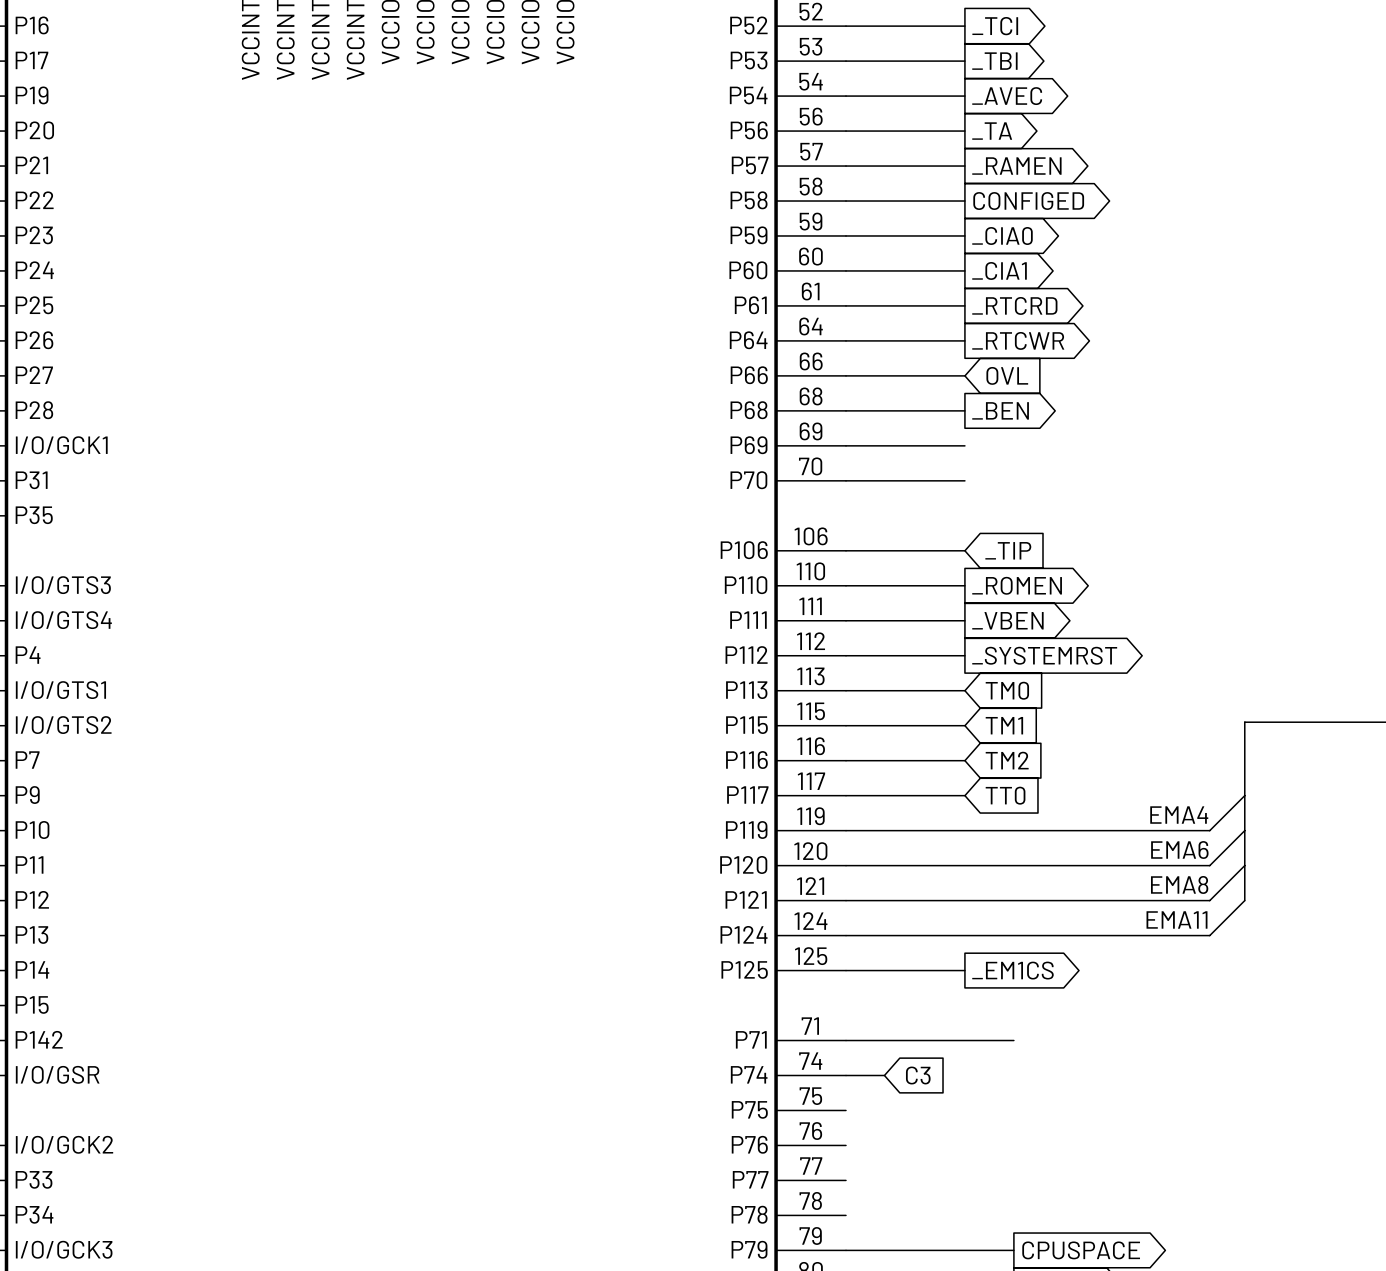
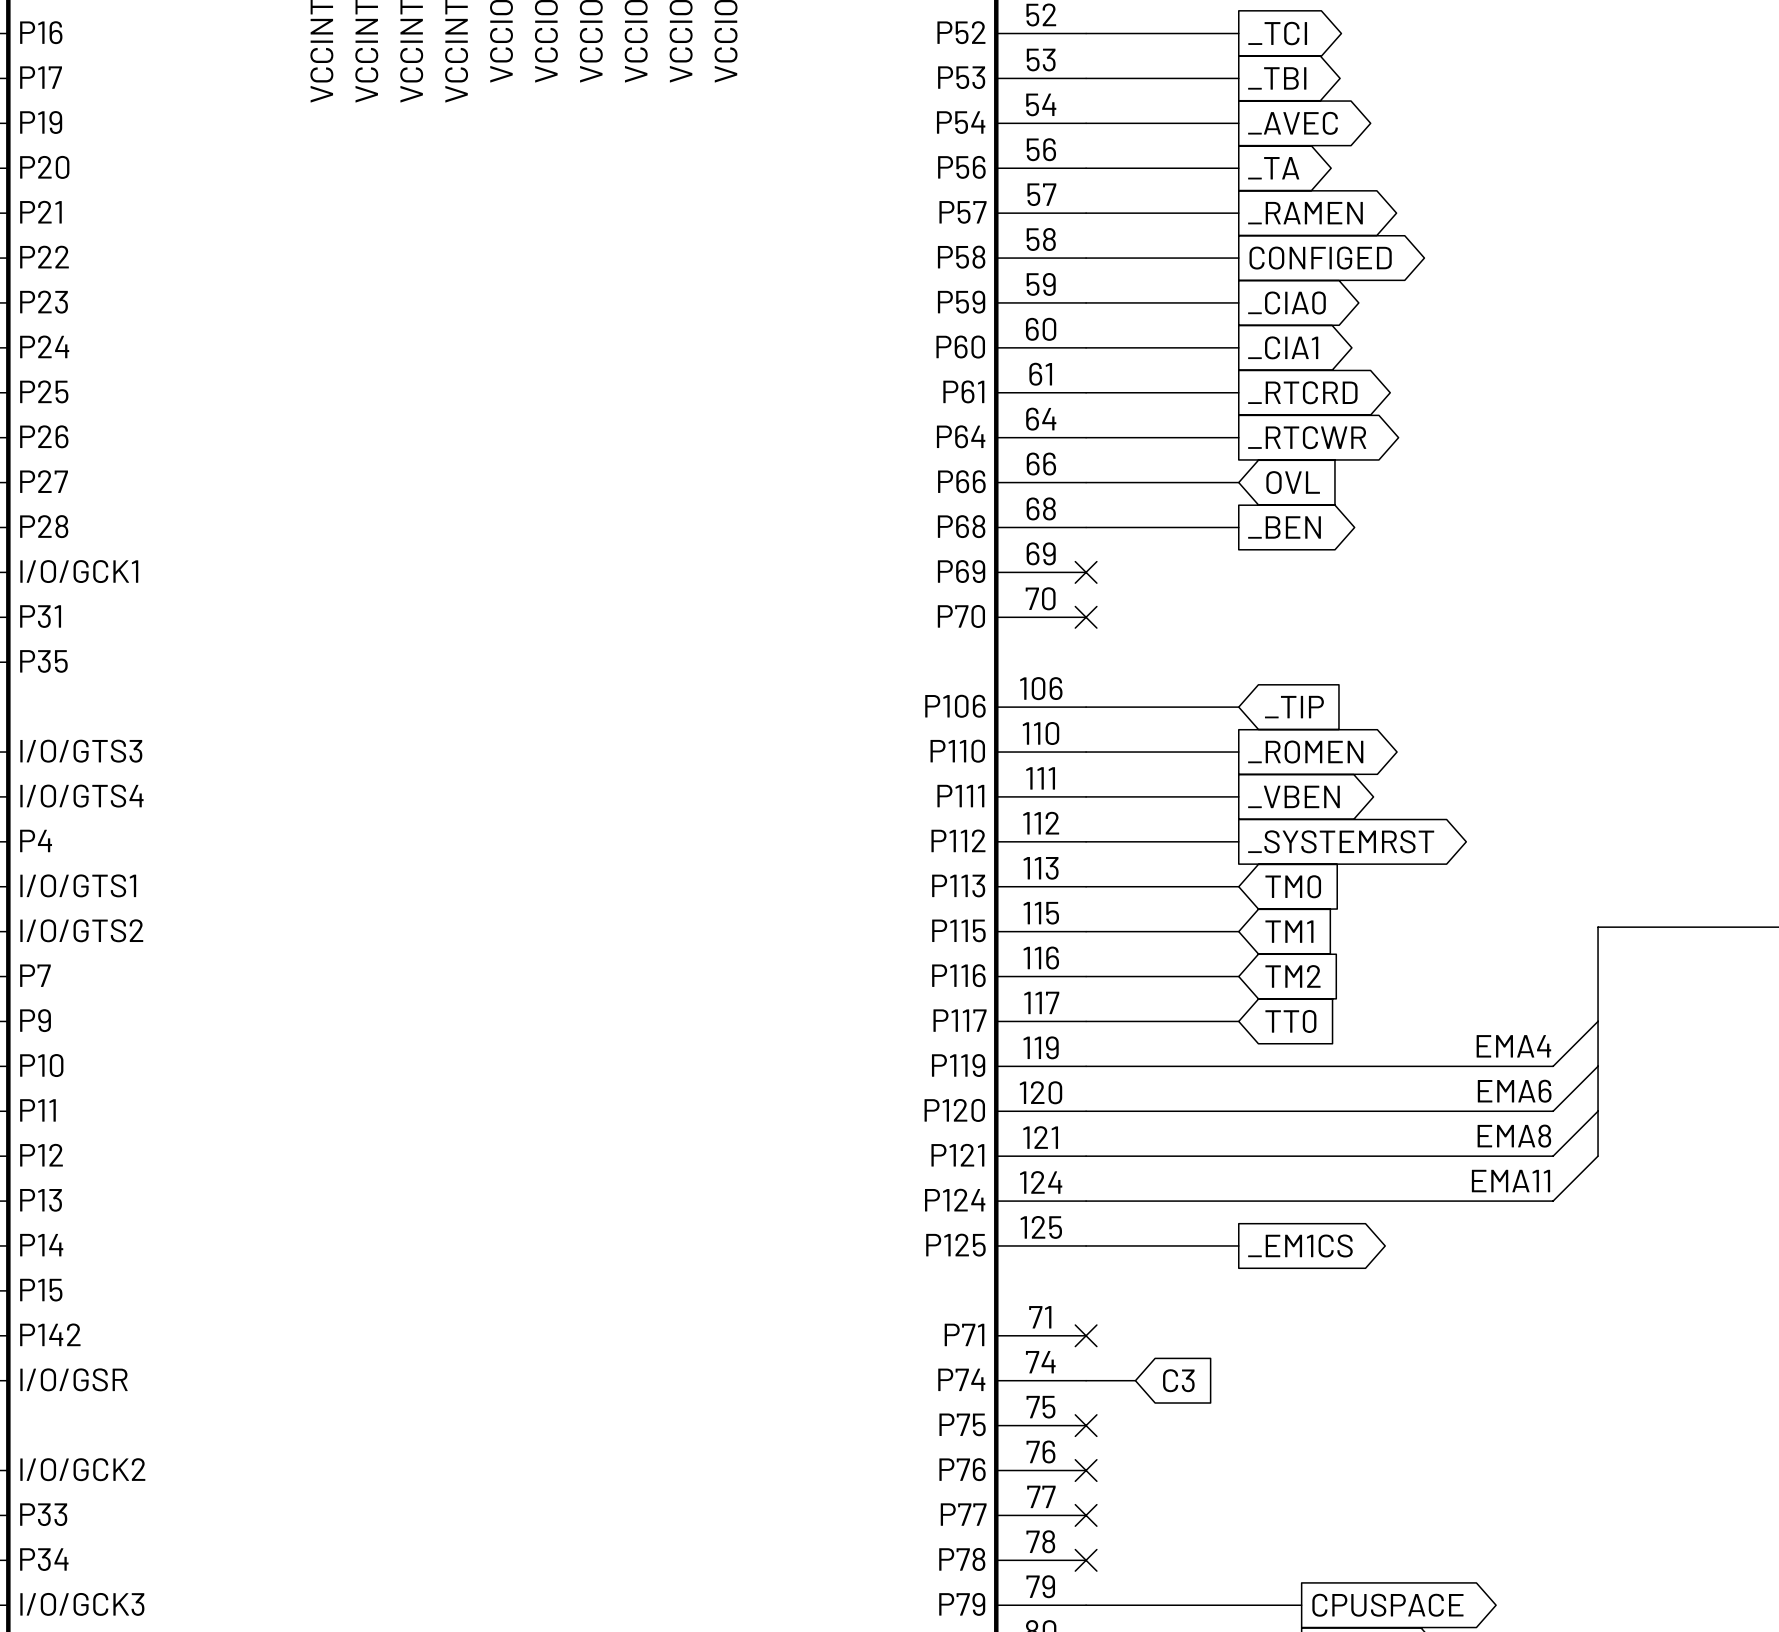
wire: (846, 445) (964, 445) -> none
no-connect mark: none -> (1086, 572)
wire: (846, 480) (964, 480) -> none
no-connect mark: none -> (1086, 617)
wire: (846, 1040) (1013, 1040) -> none
no-connect mark: none -> (1086, 1335)
no-connect mark: none -> (1086, 1425)
no-connect mark: none -> (1086, 1470)
no-connect mark: none -> (1086, 1515)
no-connect mark: none -> (1086, 1560)

